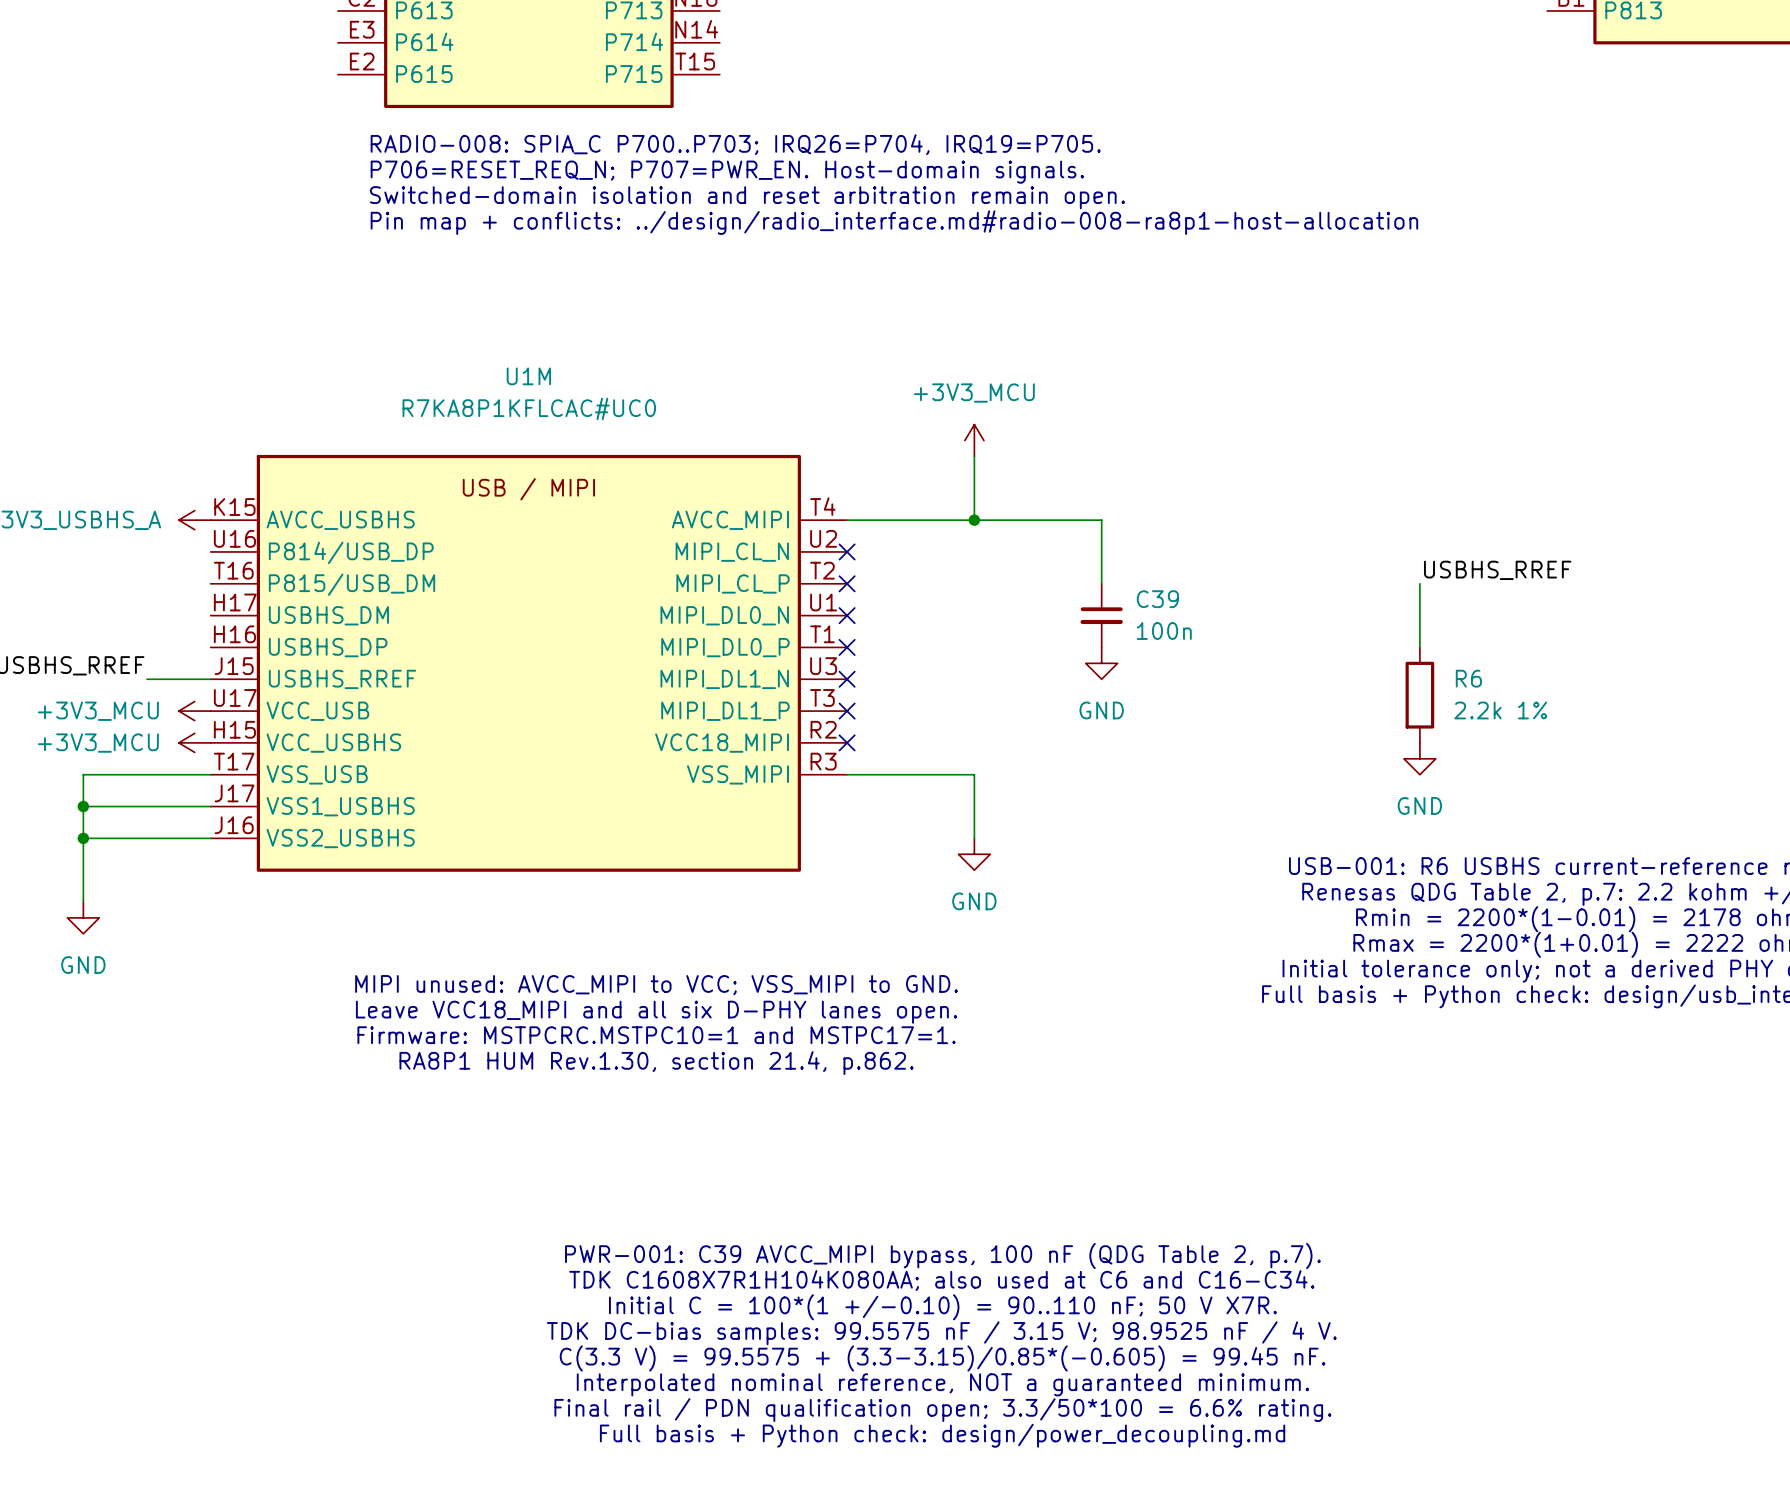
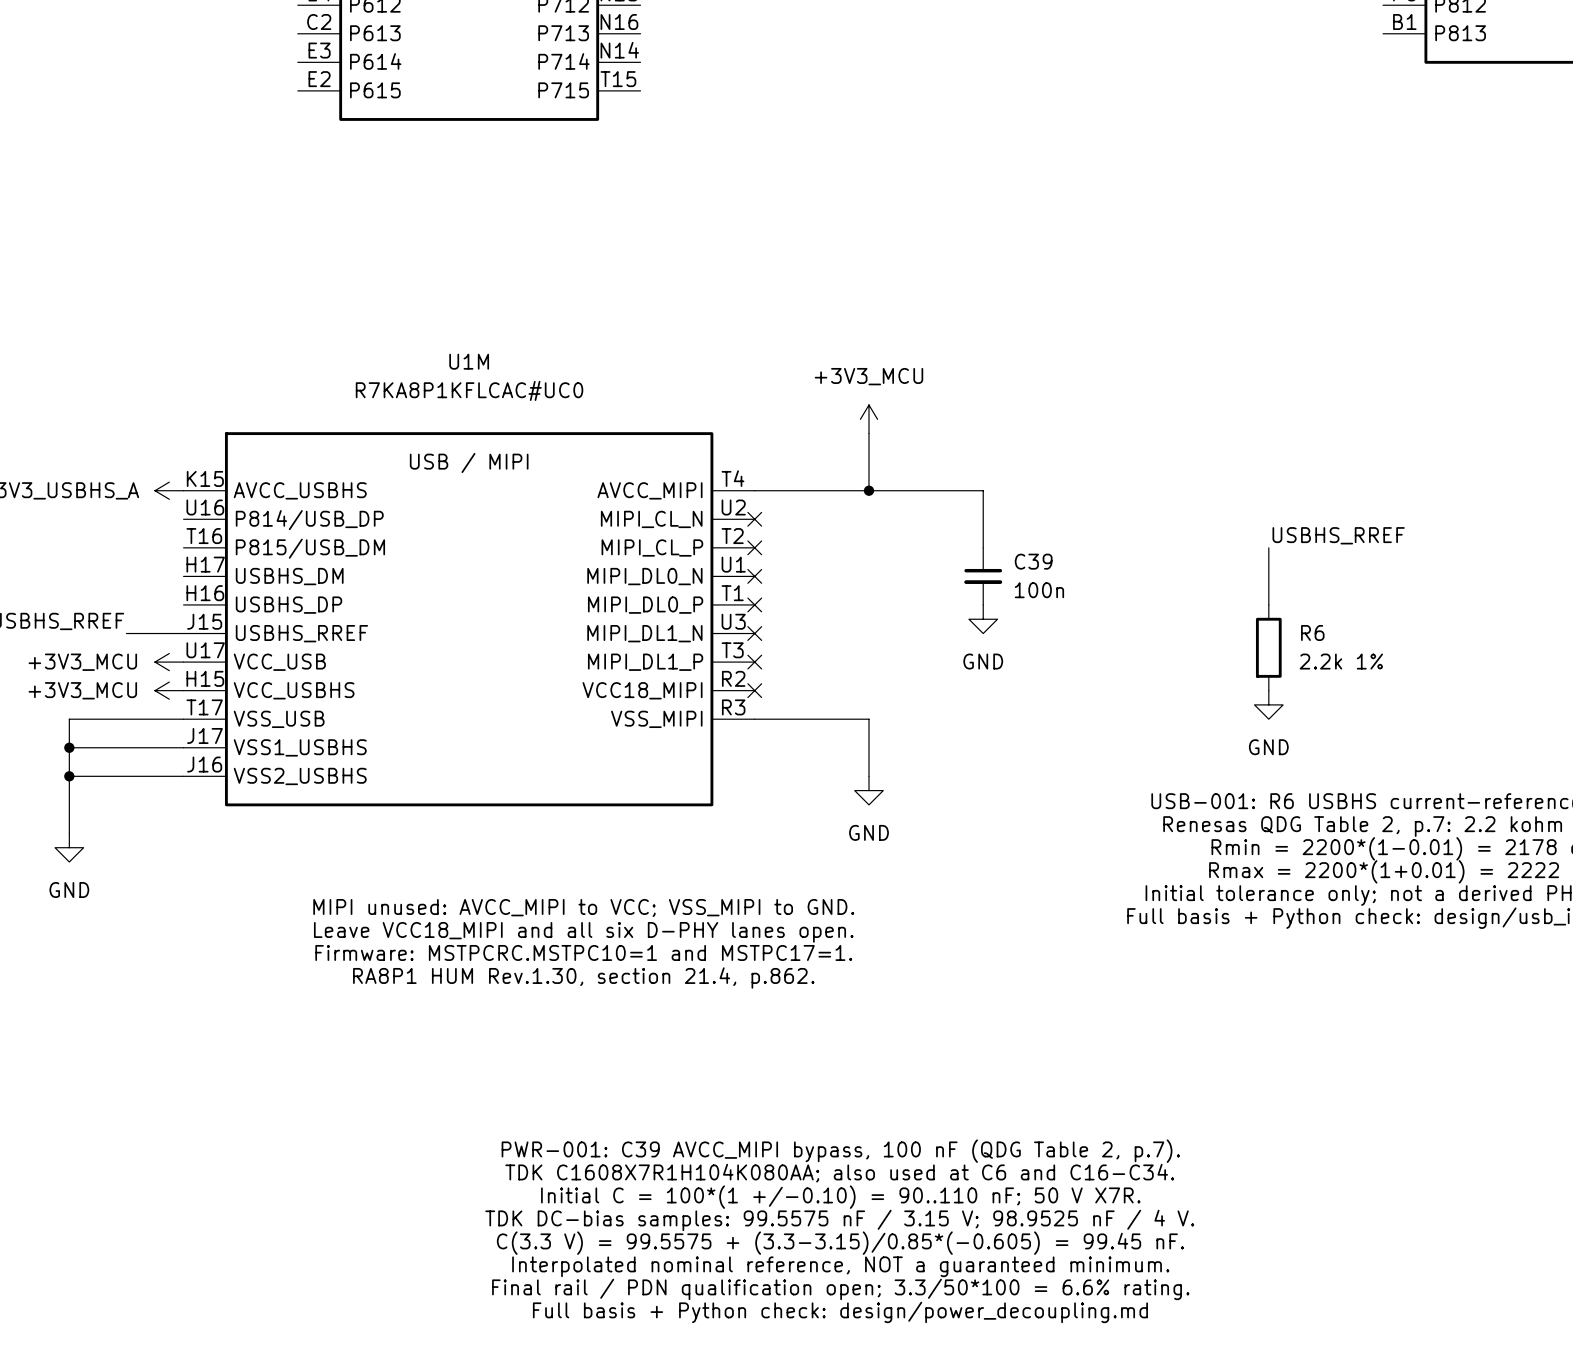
text: RADIO-008: SPIA_C P700..P703; IRQ26=P704, IRQ19=P705. (735, 144) -> none
text: P706=RESET_REQ_N; P707=PWR_EN. Host-domain signals. (727, 172) -> none
text: Switched-domain isolation and reset arbitration remain open. (747, 197) -> none
text: Pin map + conflicts: ../design/radio_interface.md#radio-008-ra8p1-host-allocation (894, 222) -> none

